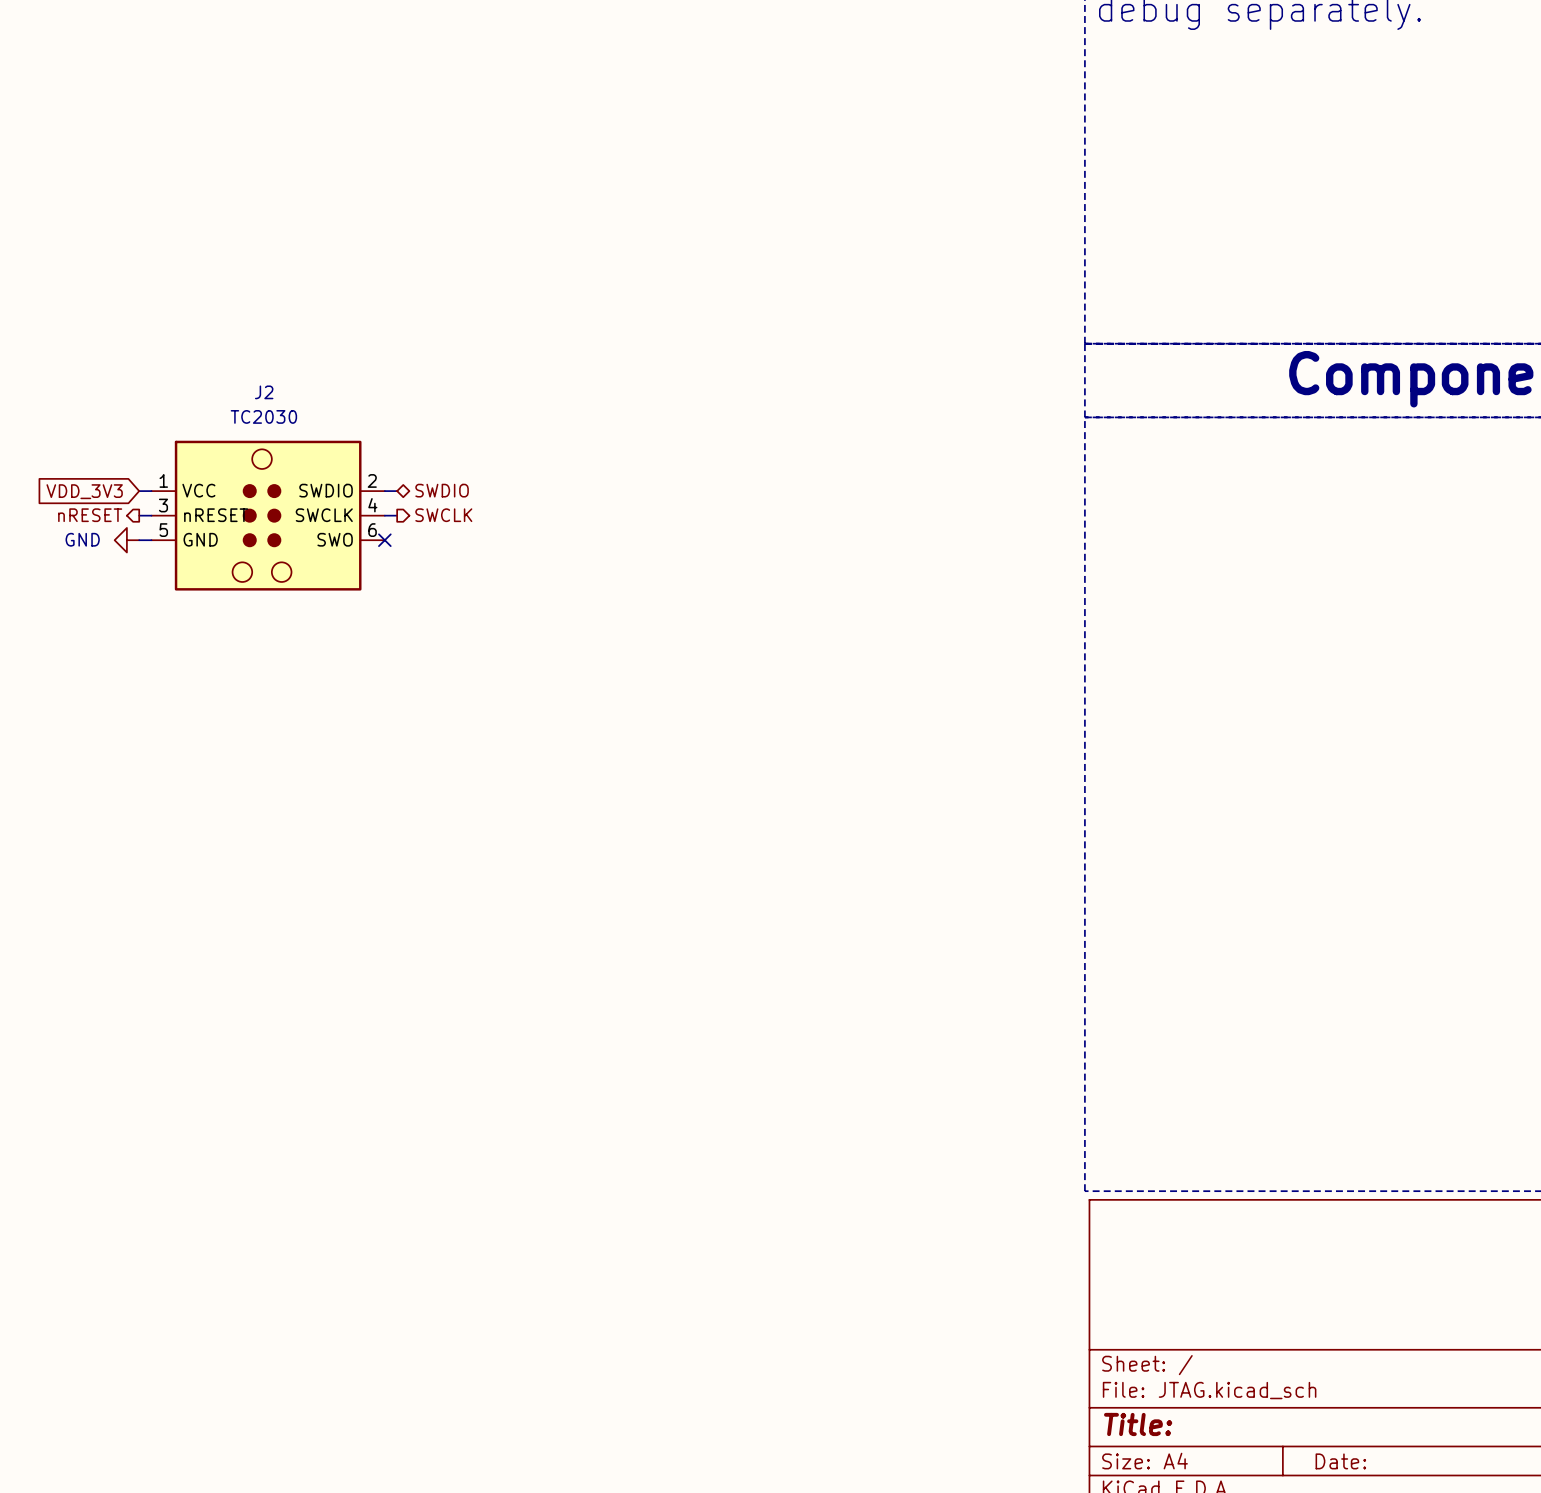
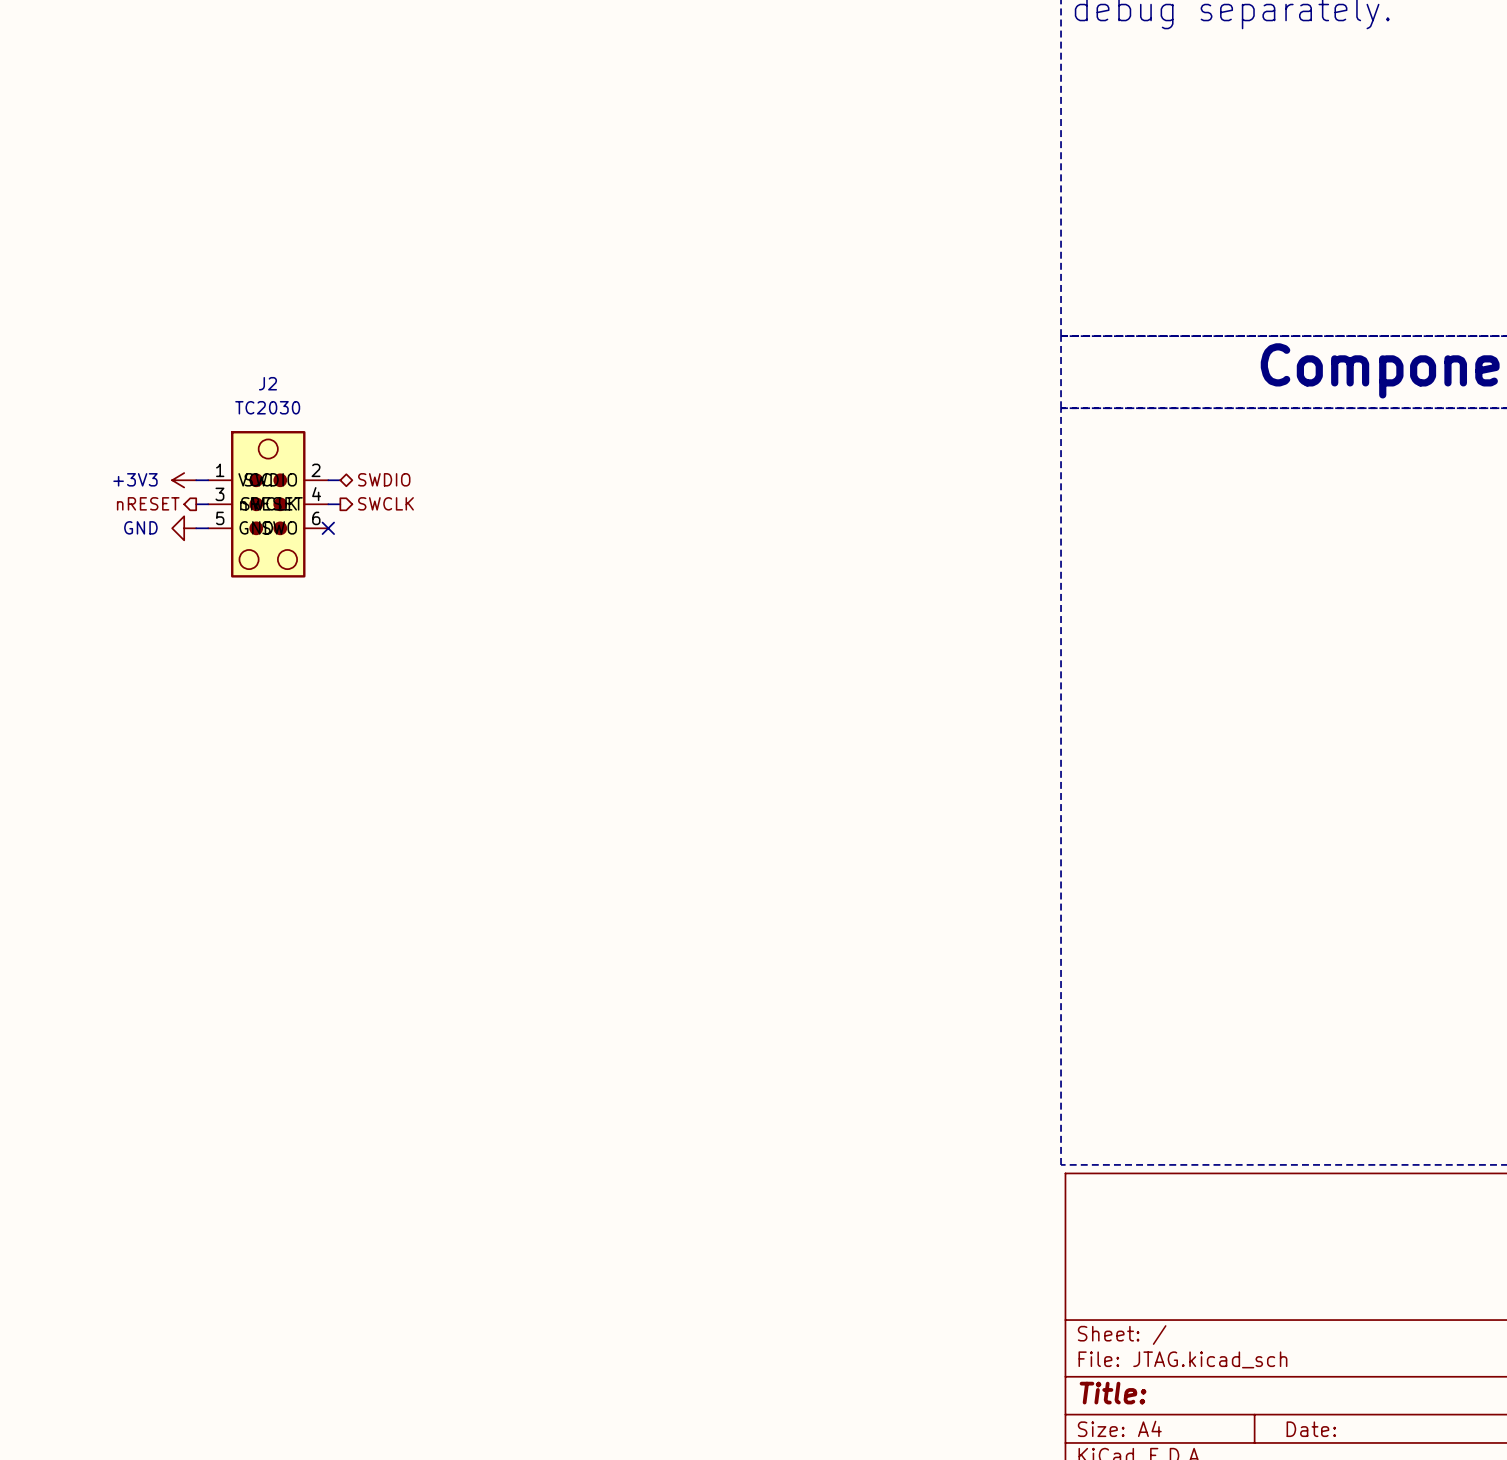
J2 symbol: [151, 440, 385, 591] -> [208, 431, 329, 578]
hierarchical label position: SWDIO (442, 490) -> SWDIO (384, 479)
global label: VDD_3V3 (84, 491) -> none
power symbol: none -> +3V3 (184, 480)
hierarchical label position: nRESET (90, 515) -> nRESET (148, 503)
hierarchical label position: SWCLK (443, 515) -> SWCLK (385, 503)
power symbol position: GND (126, 540) -> GND (184, 528)
no-connect mark position: (384, 540) -> (328, 528)

